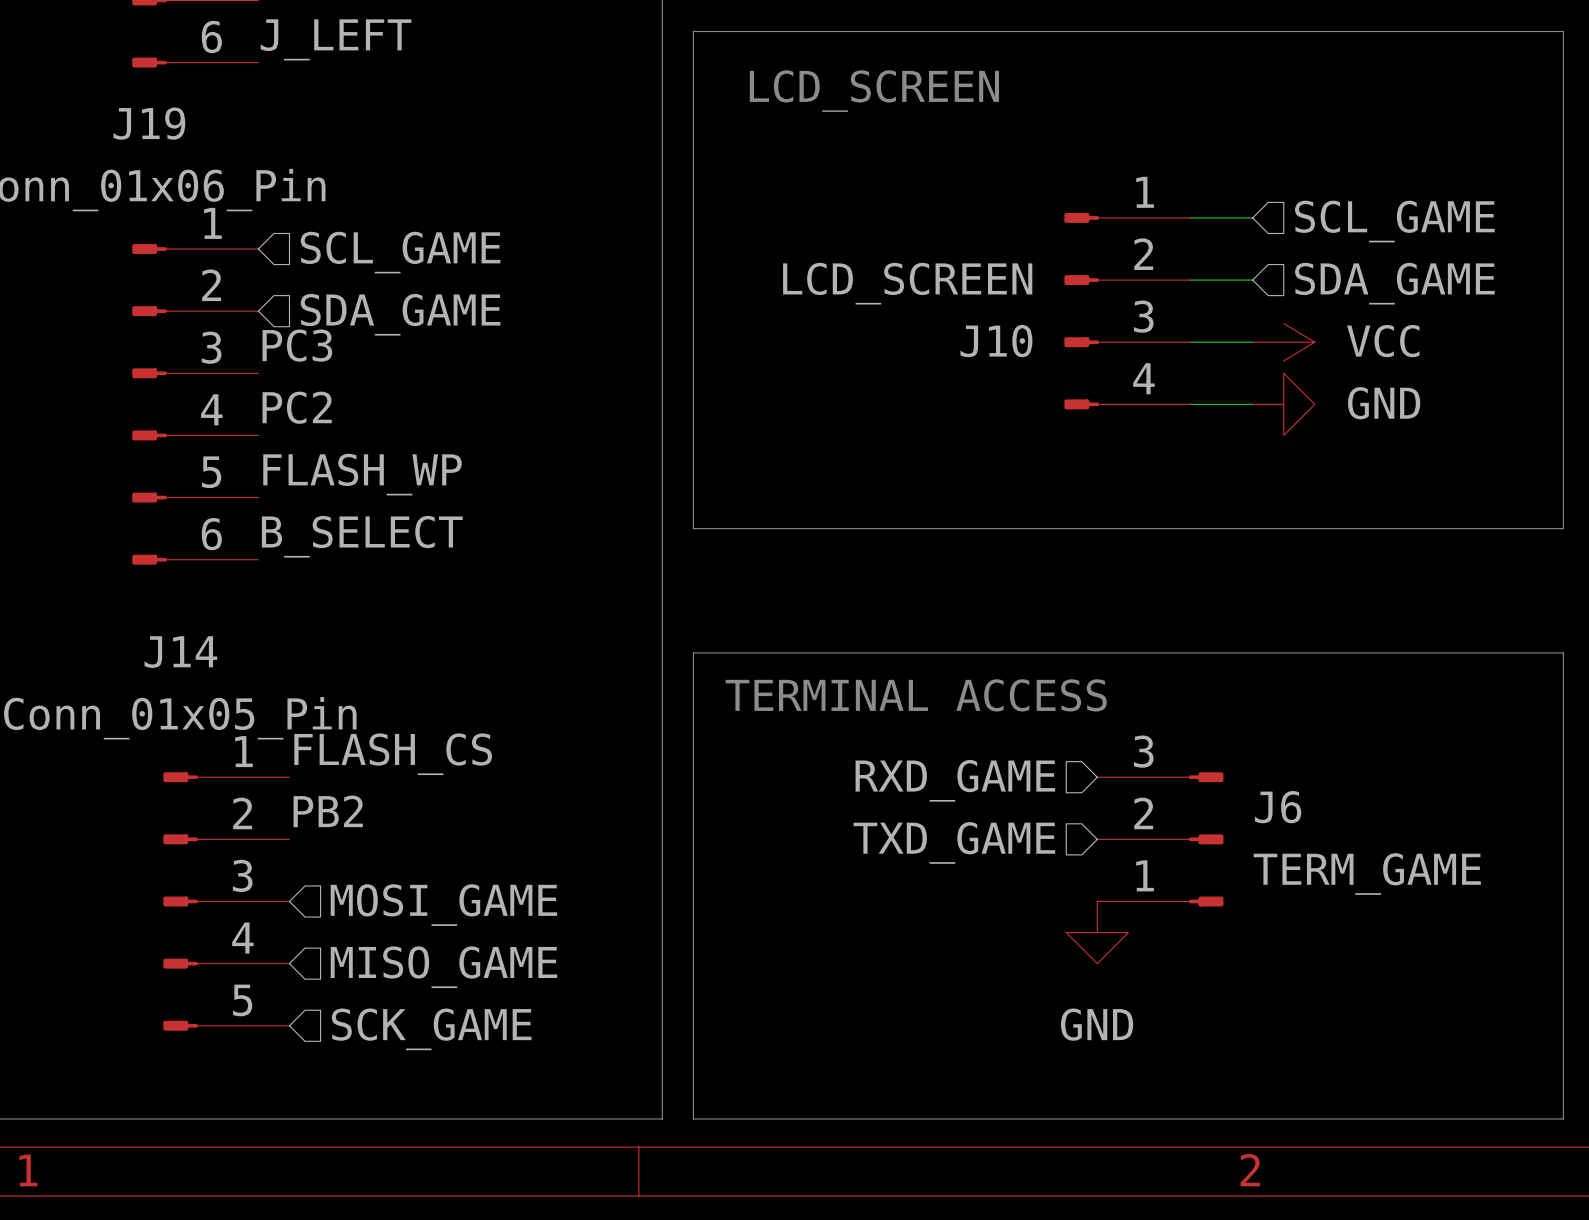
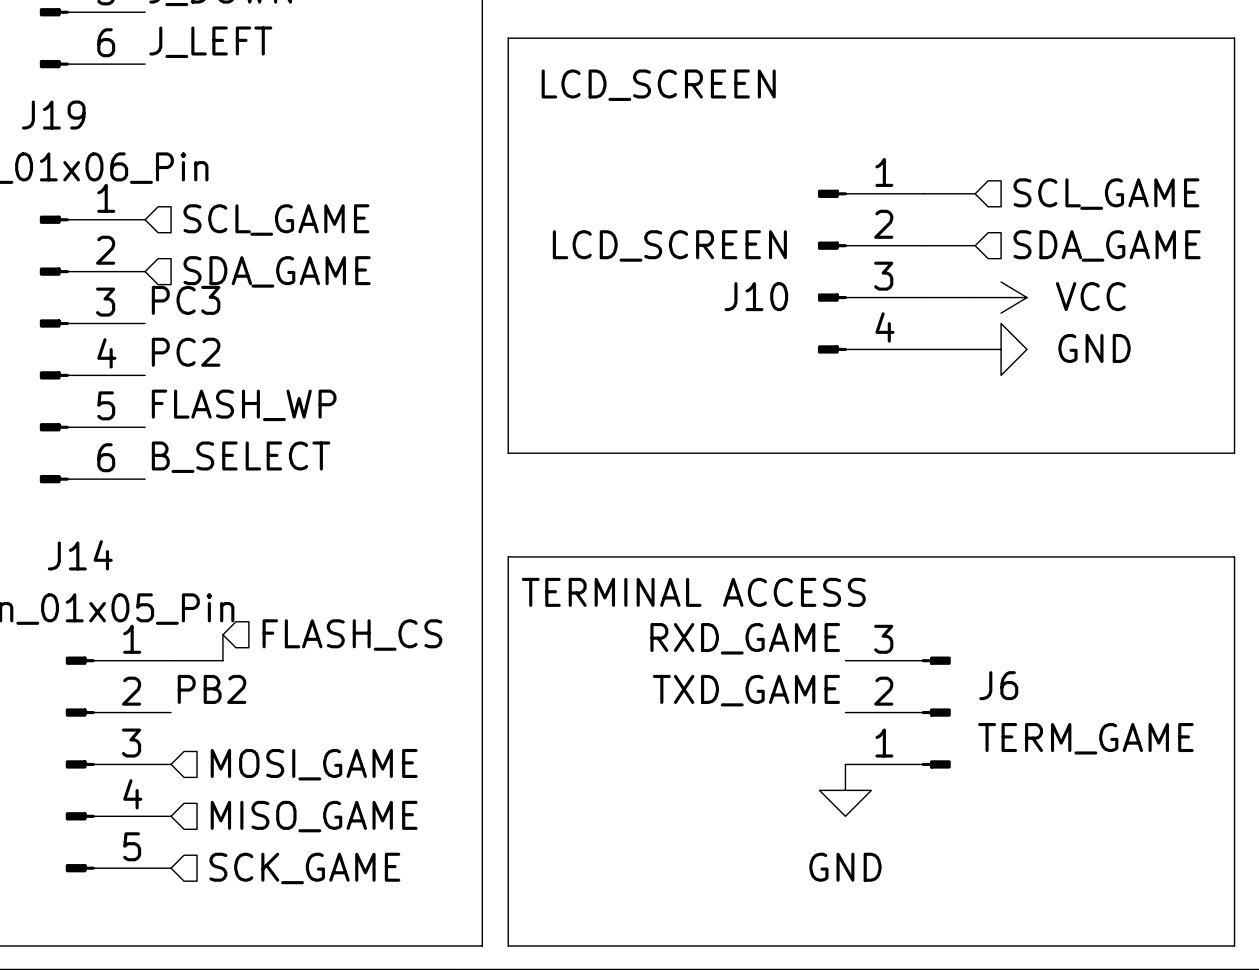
wire: none -> (222, 634) (222, 660) (171, 660)
hierarchical label: none -> FLASH_CS (352, 635)
label: FLASH_CS (393, 754) -> none
label: none -> RXD_GAME (745, 638)
hierarchical label: RXD_GAME (955, 780) -> none
label: none -> TXD_GAME (746, 690)
hierarchical label: TXD_GAME (954, 842) -> none

